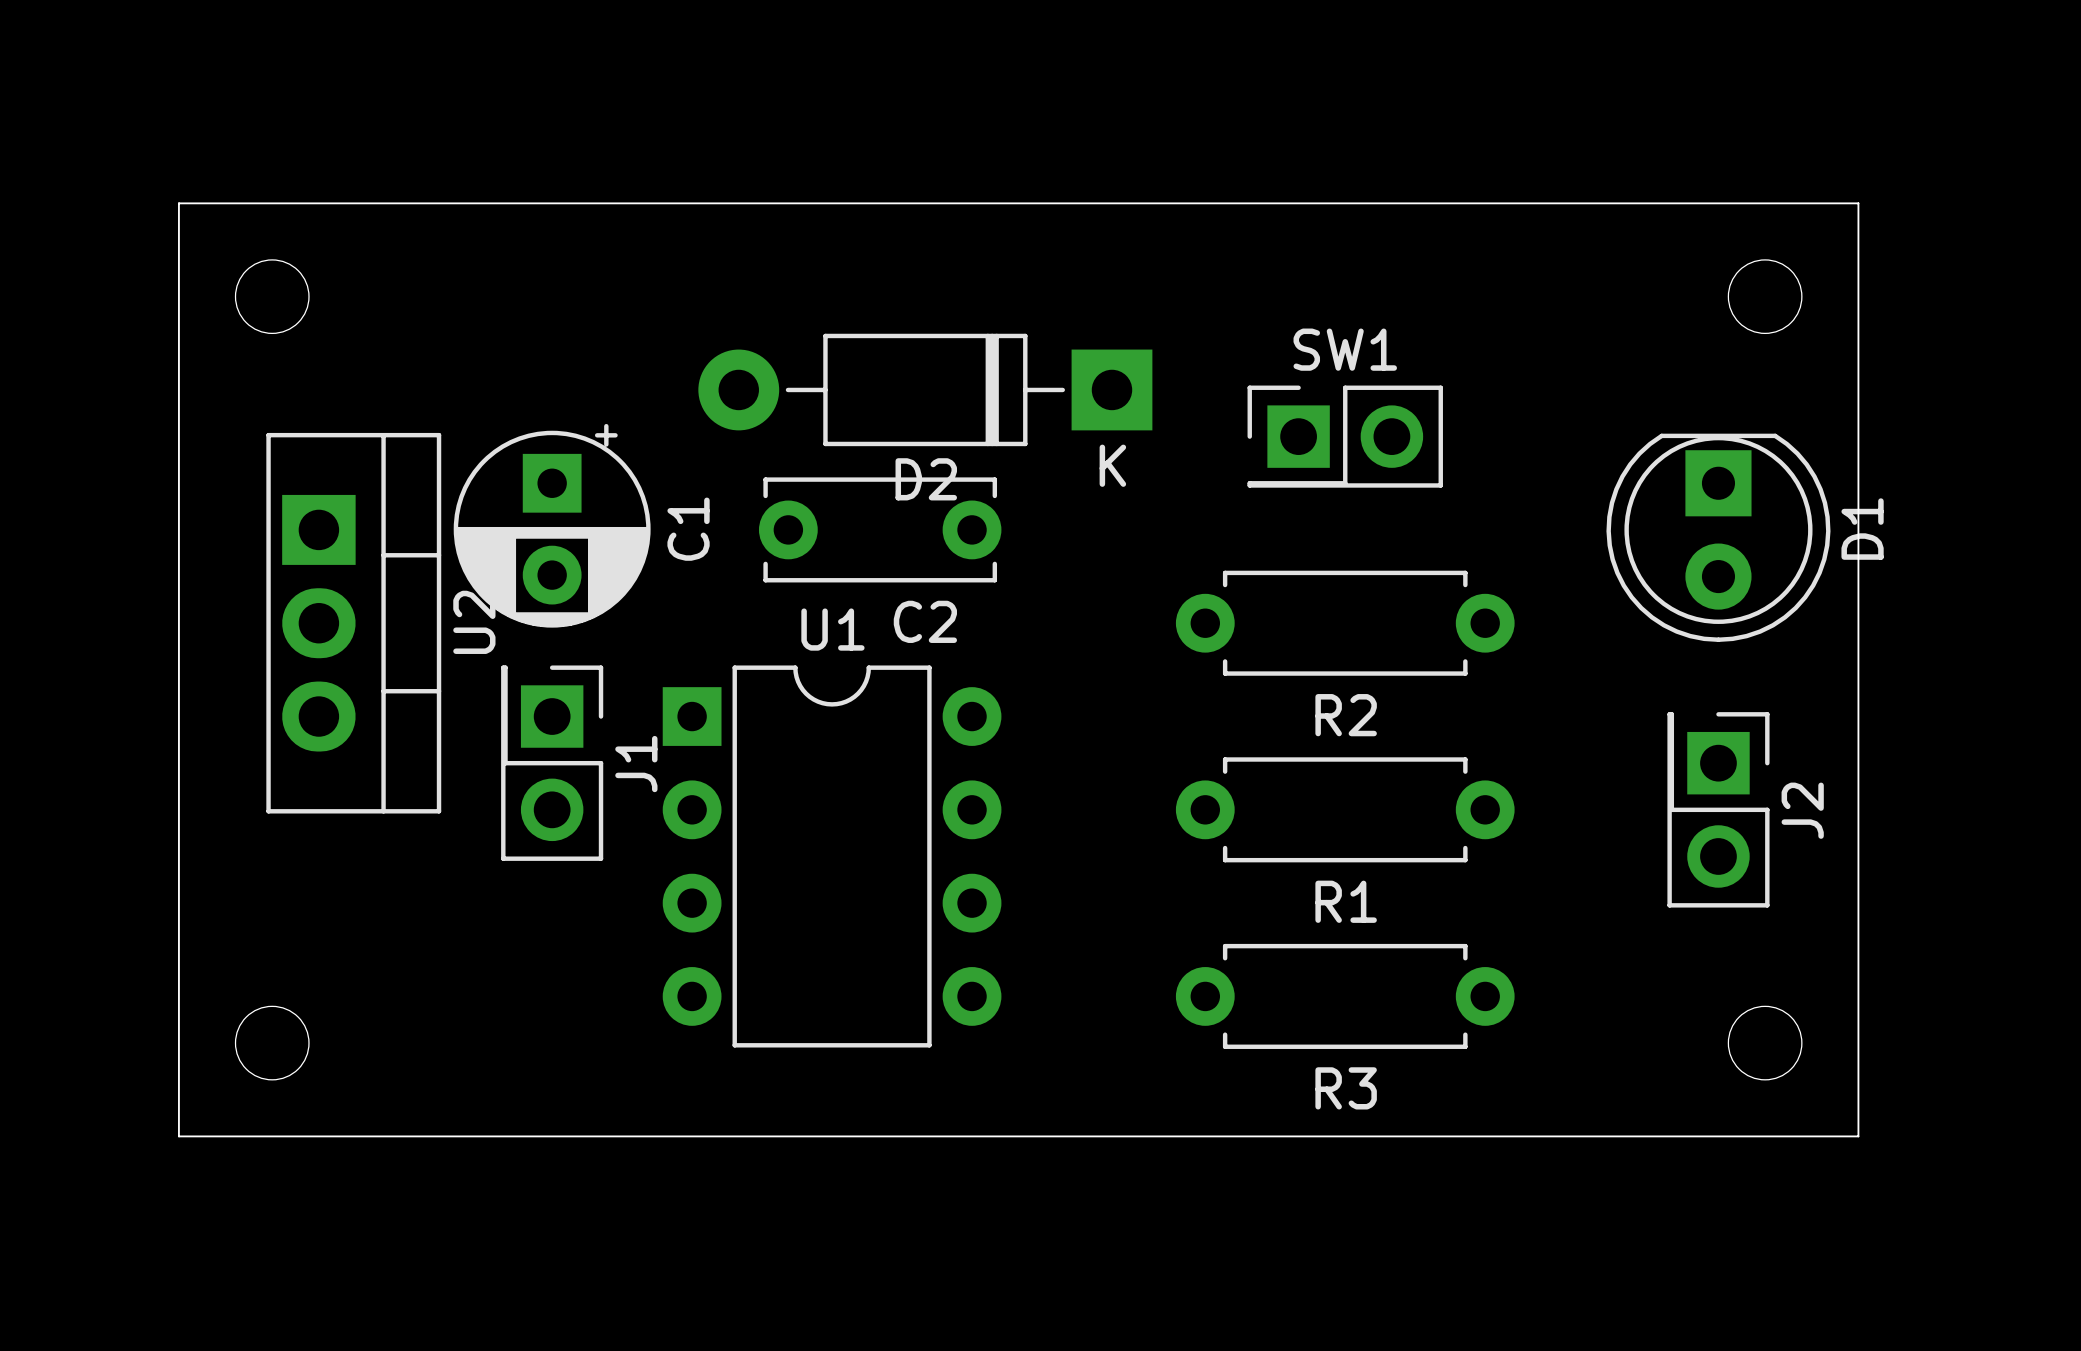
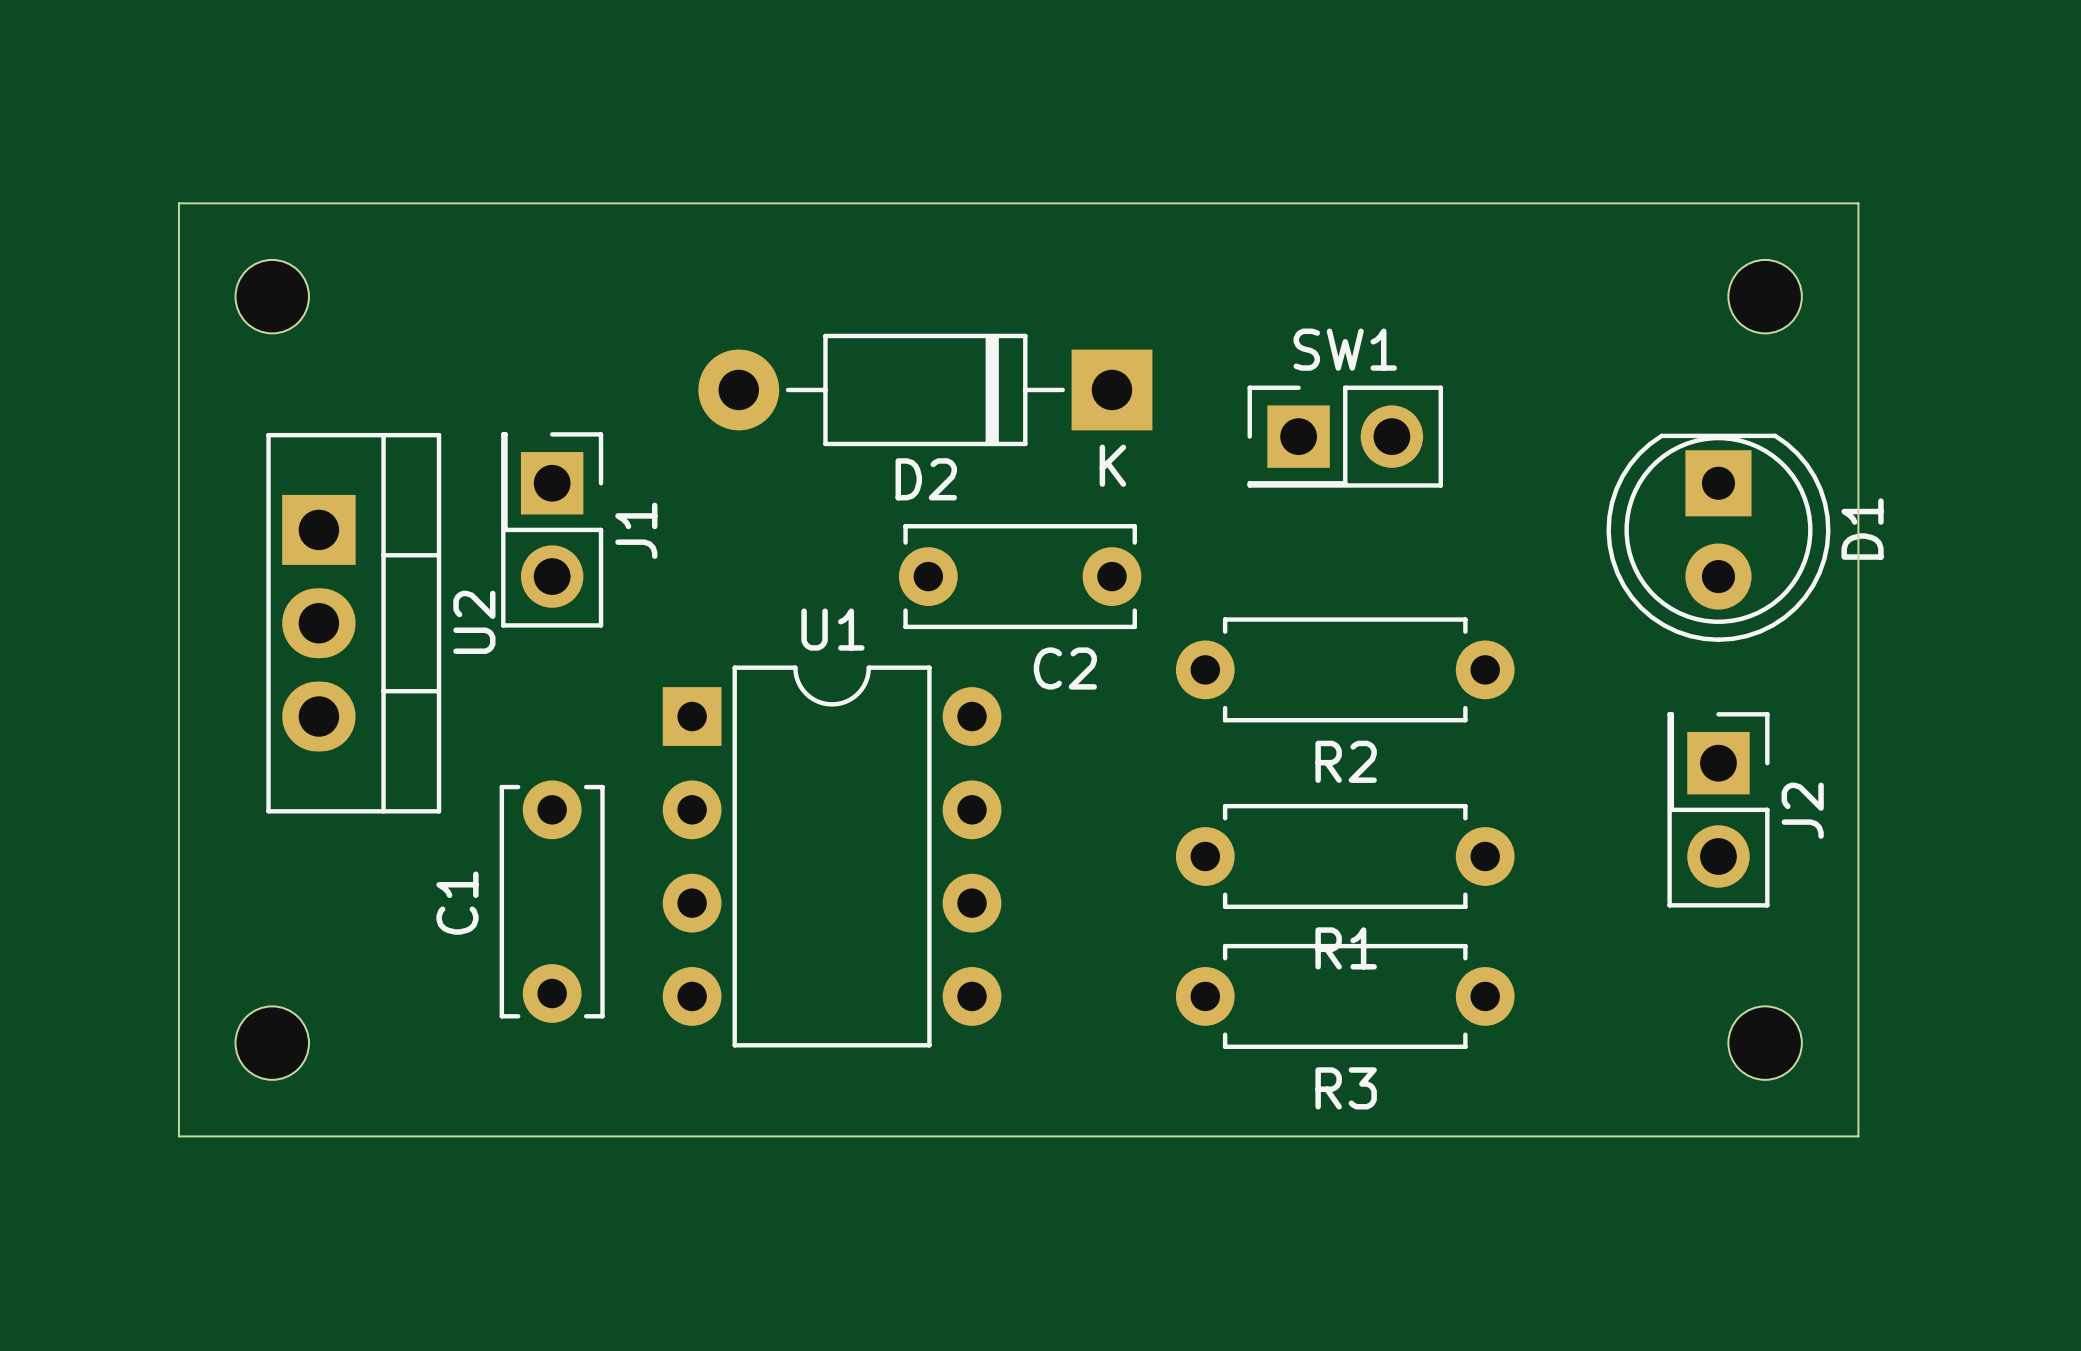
C1 footprint: [453, 423, 651, 628] -> [499, 780, 605, 1023]
C1 name position: C1 (688, 529) -> C1 (457, 903)
C2 position: (880, 529) -> (1020, 576)
R2 position: (1345, 623) -> (1345, 669)
J1 position: (552, 763) -> (552, 529)
R1 position: (1345, 809) -> (1345, 856)

